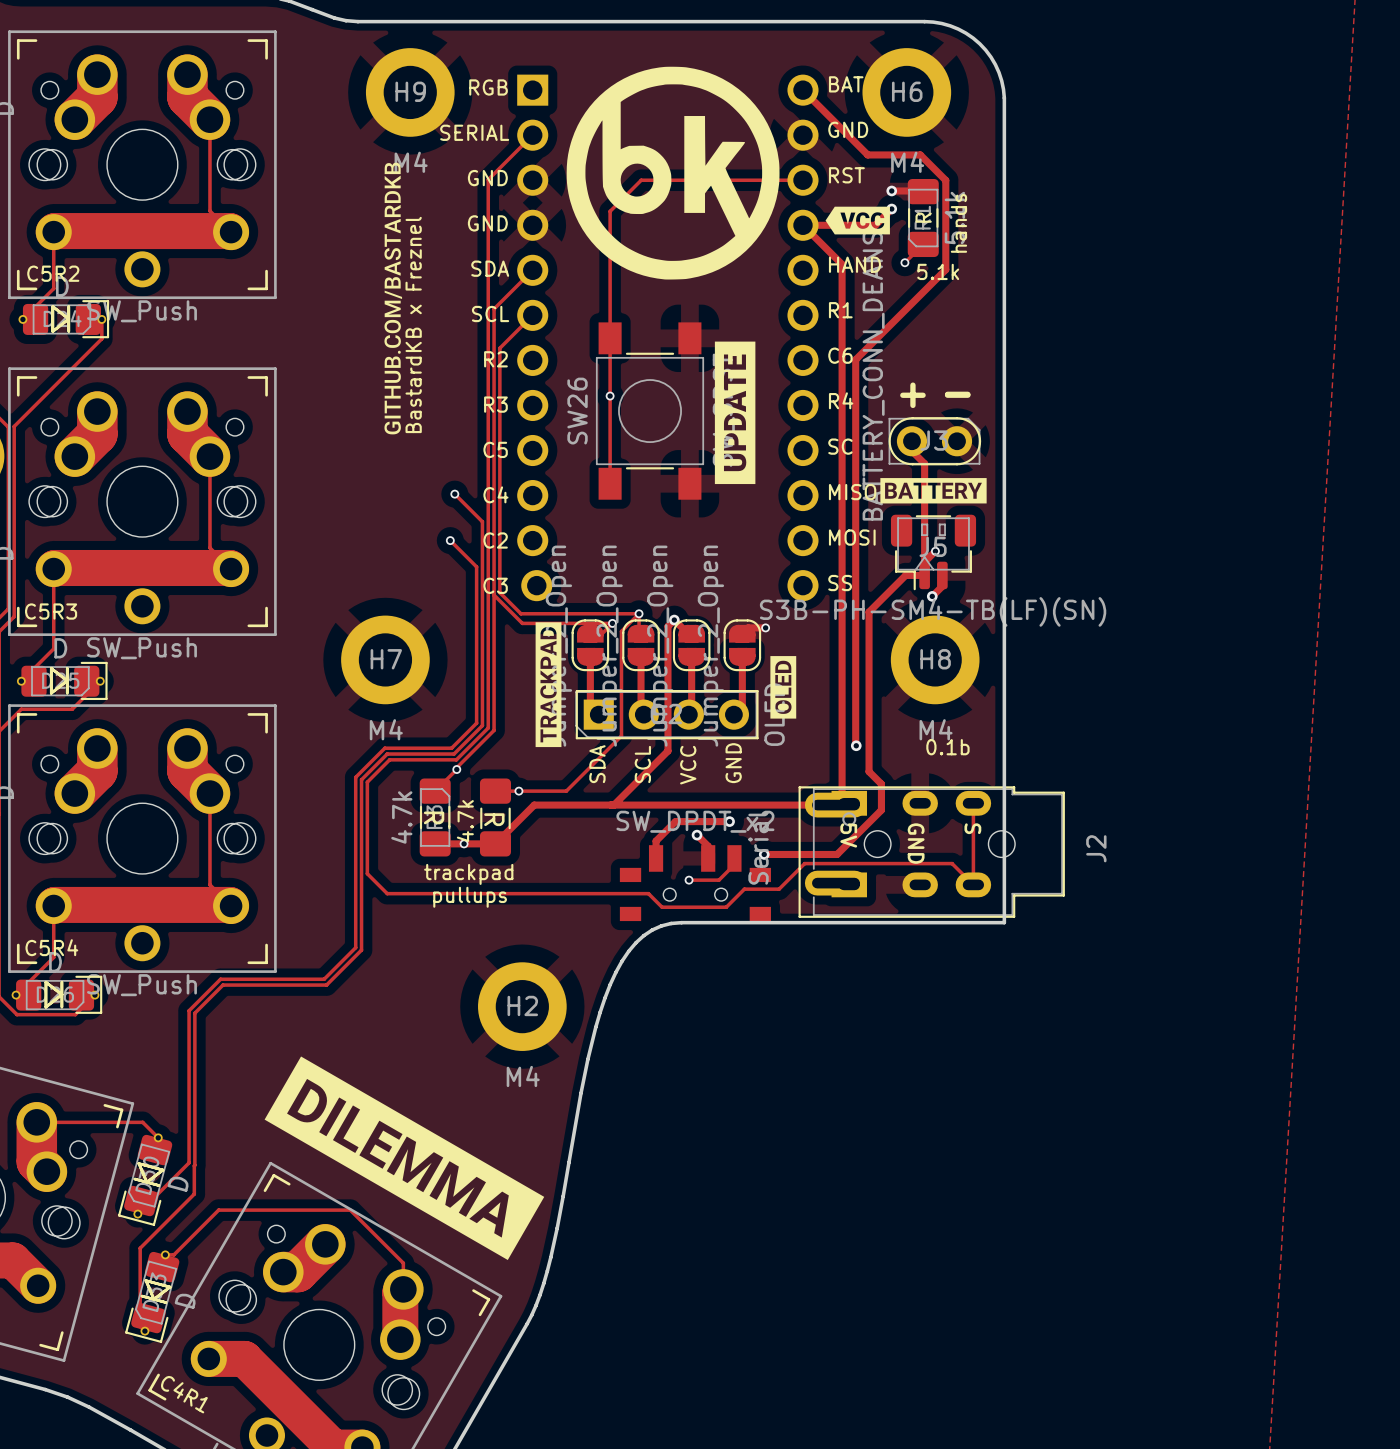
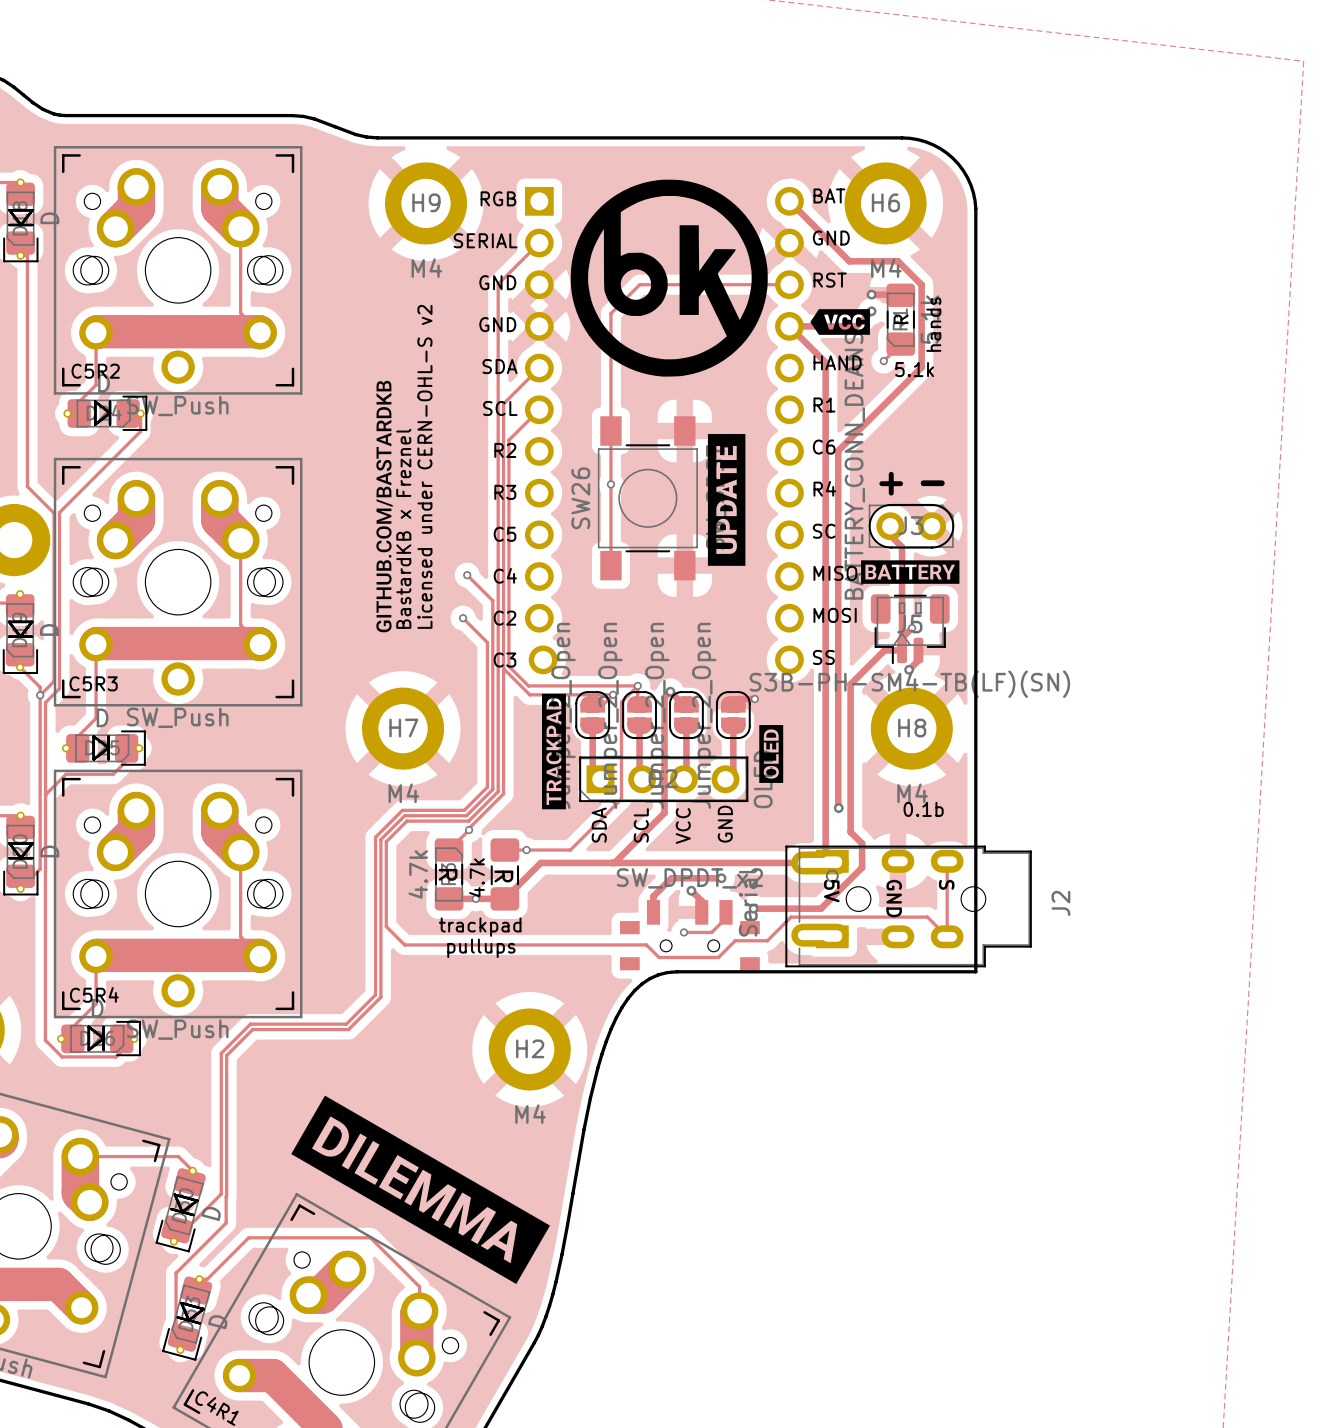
drawing position: (393, 298) -> (384, 506)
text position: BastardKB x Freznel (413, 324) -> BastardKB x Freznel (403, 528)
text: none -> Licensed under CERN-OHL-S v2 (424, 466)

